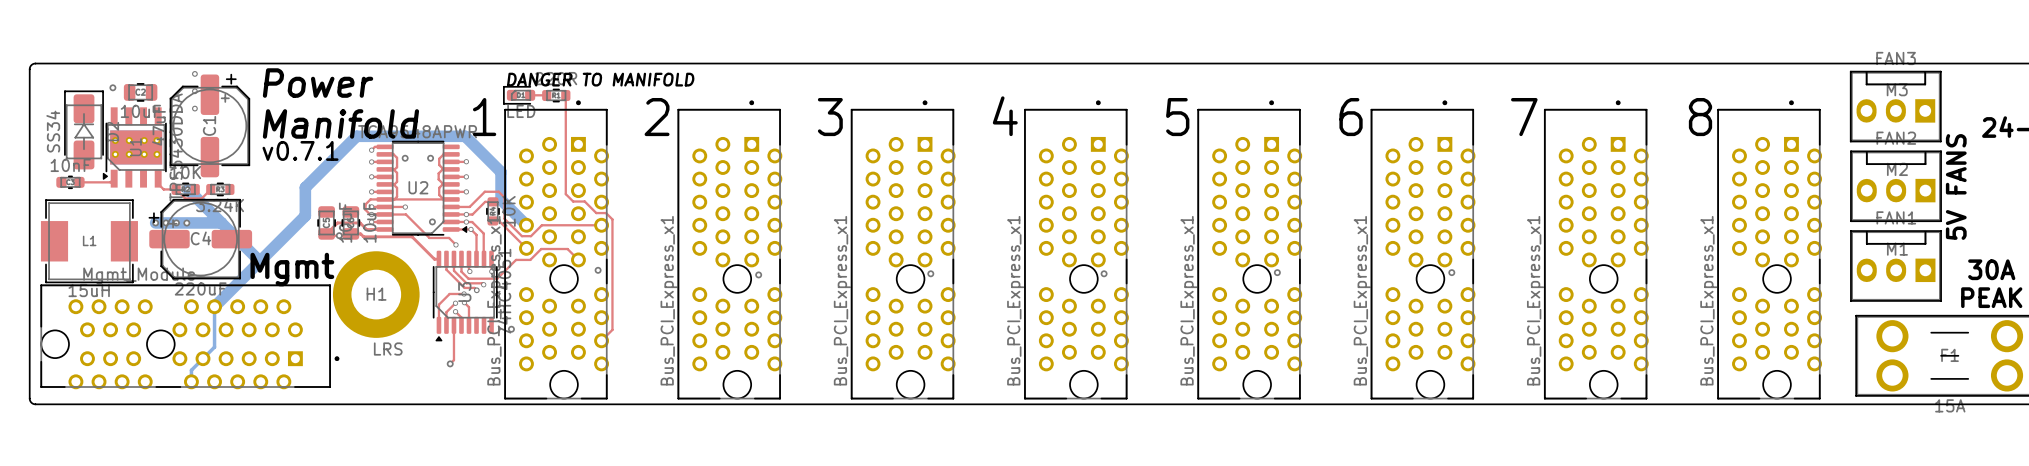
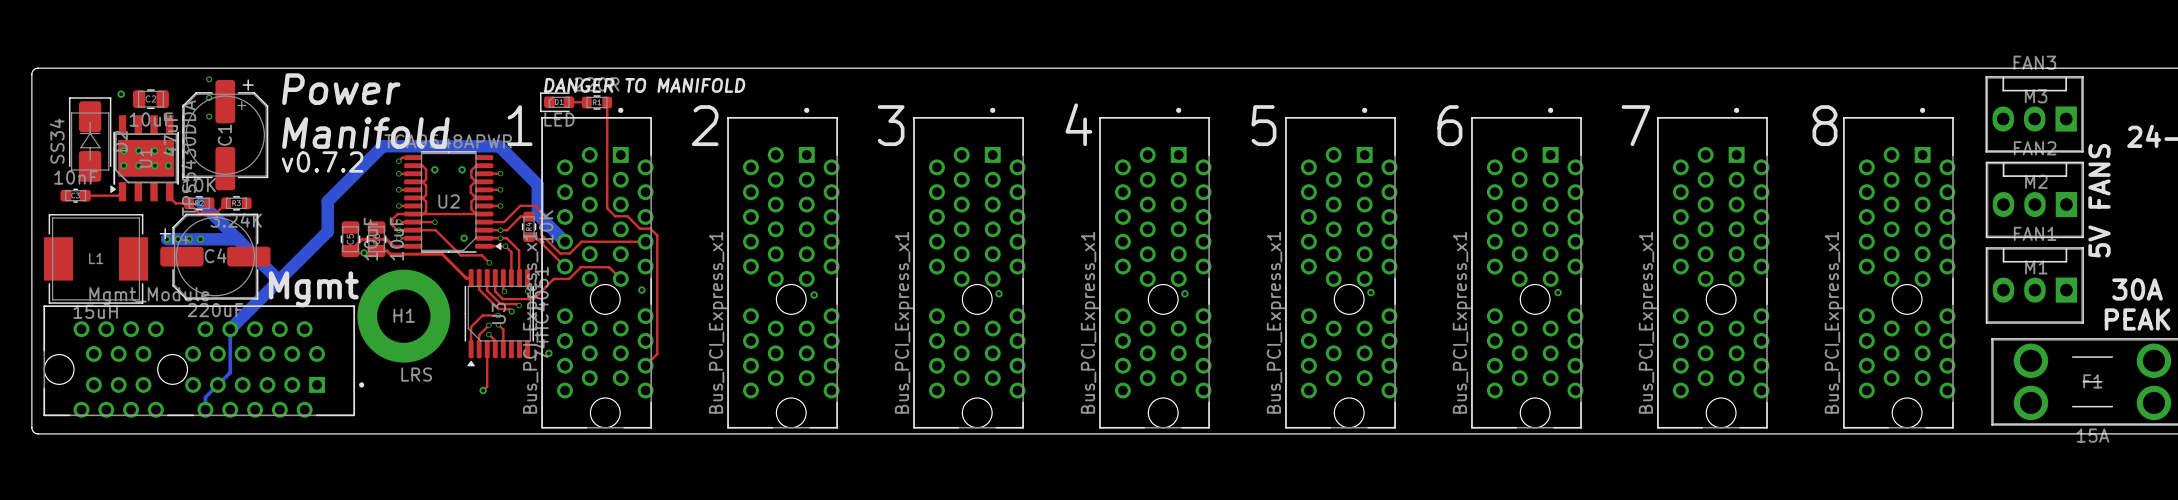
text: v0.7.1 (300, 150) -> v0.7.2 (322, 161)

